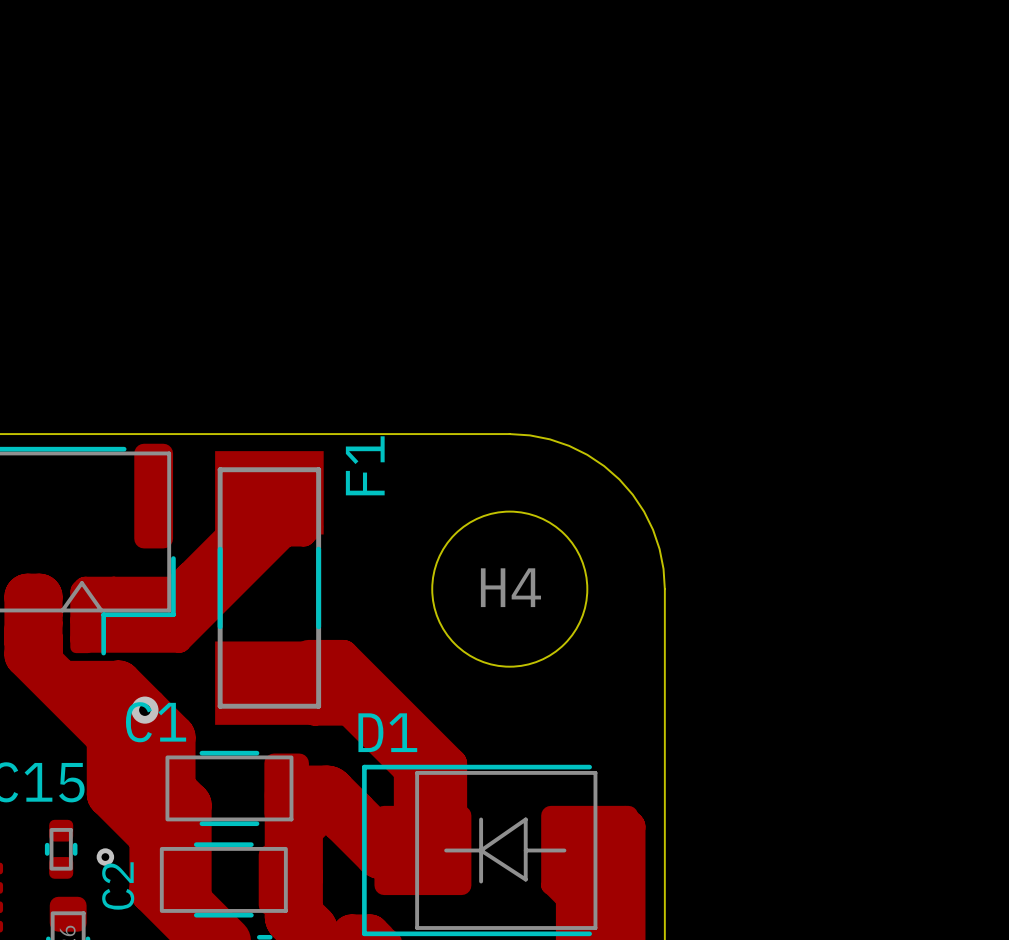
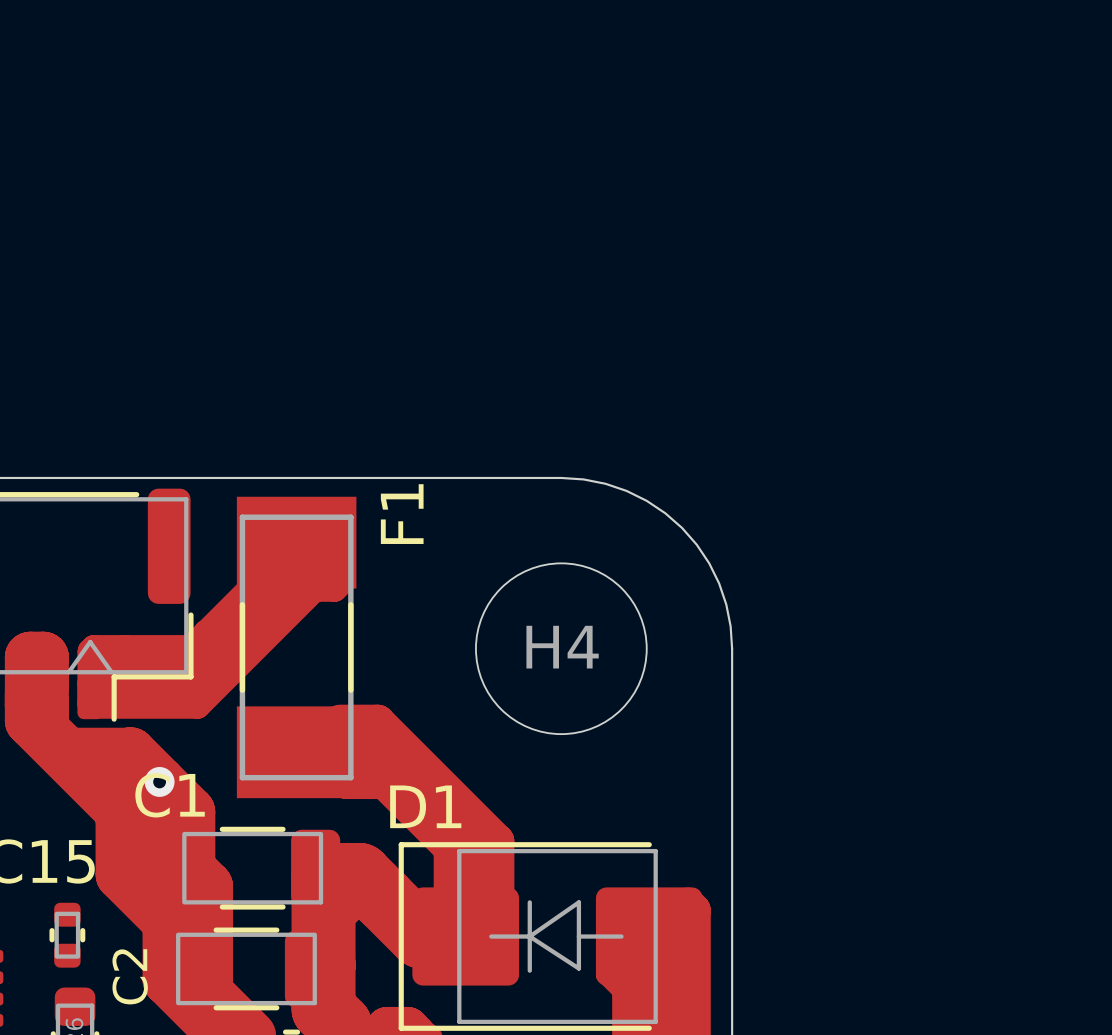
via: (105, 857) -> none

